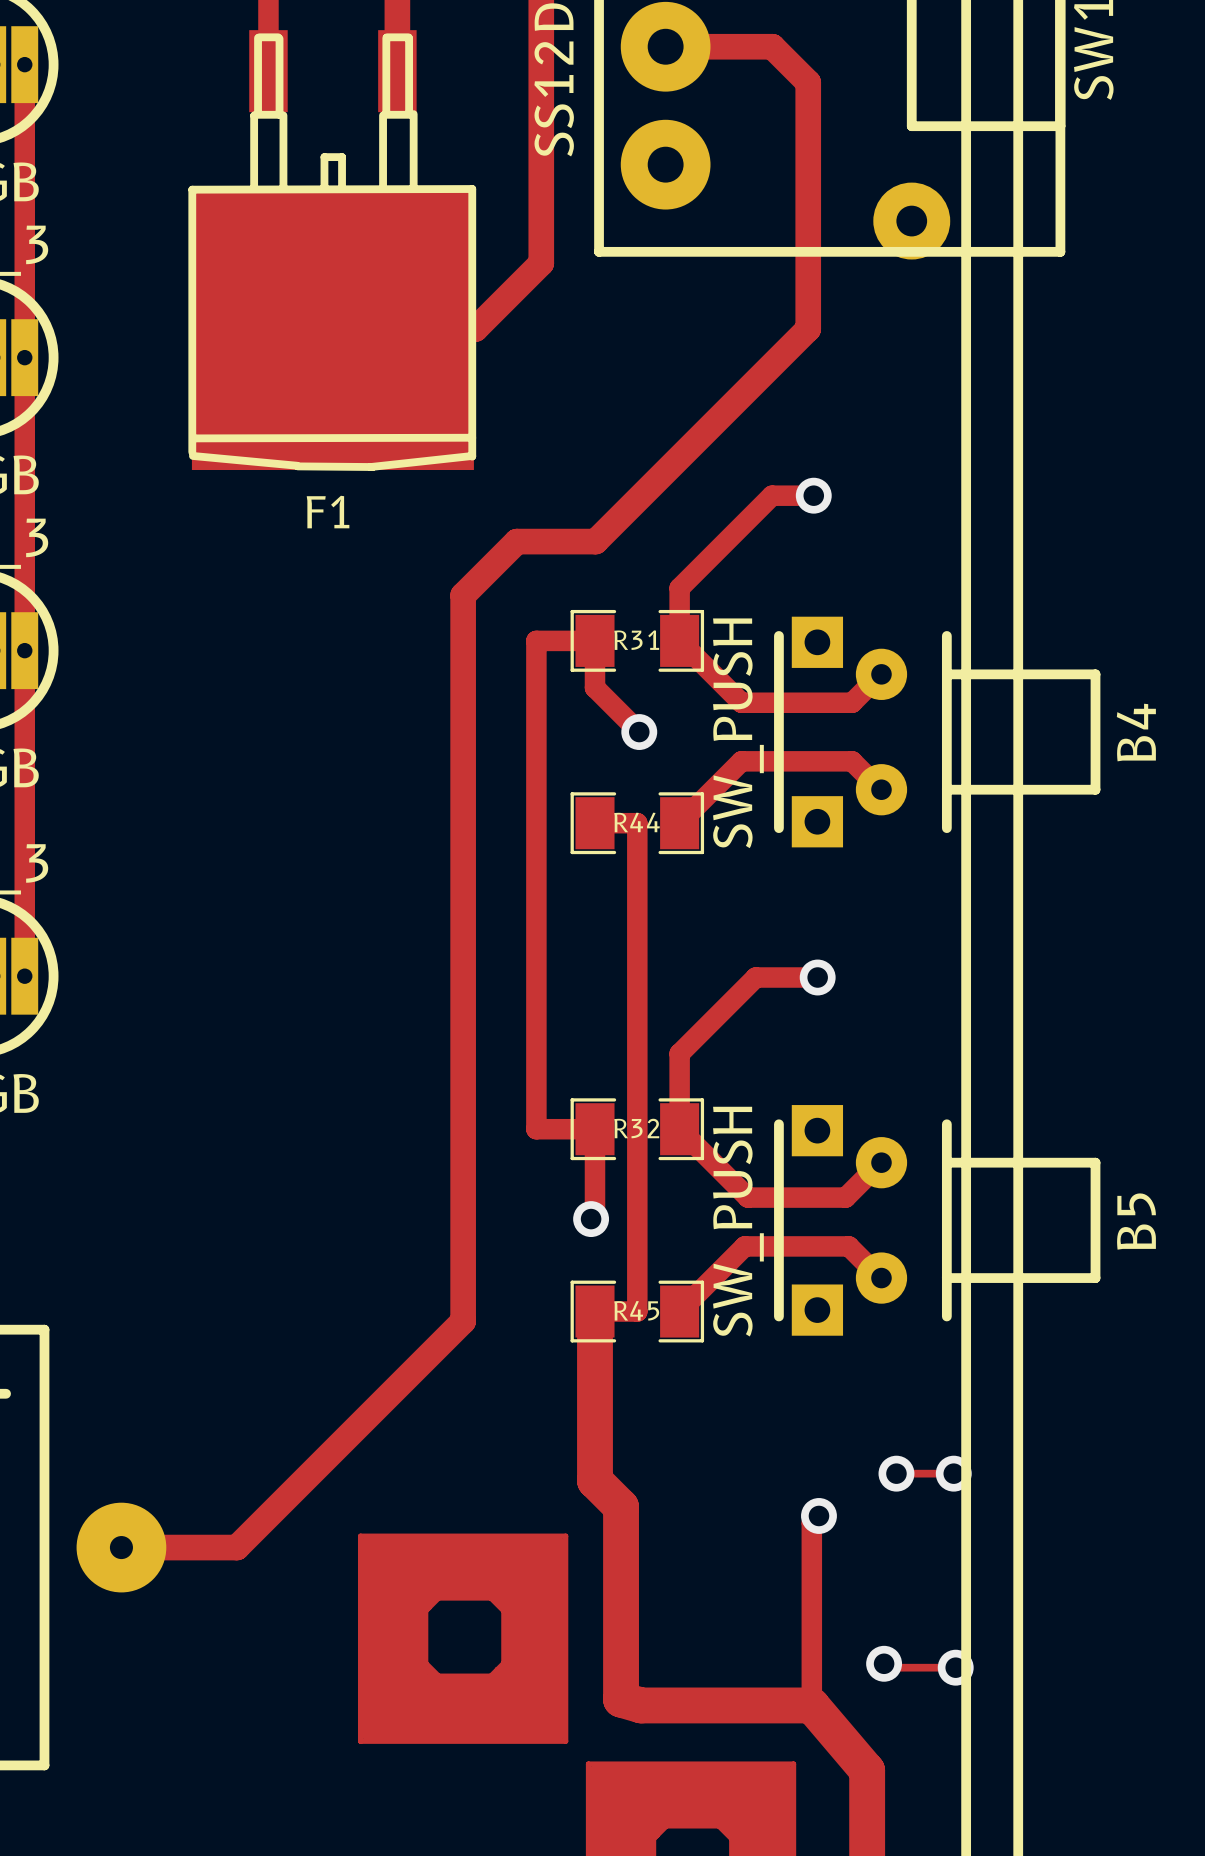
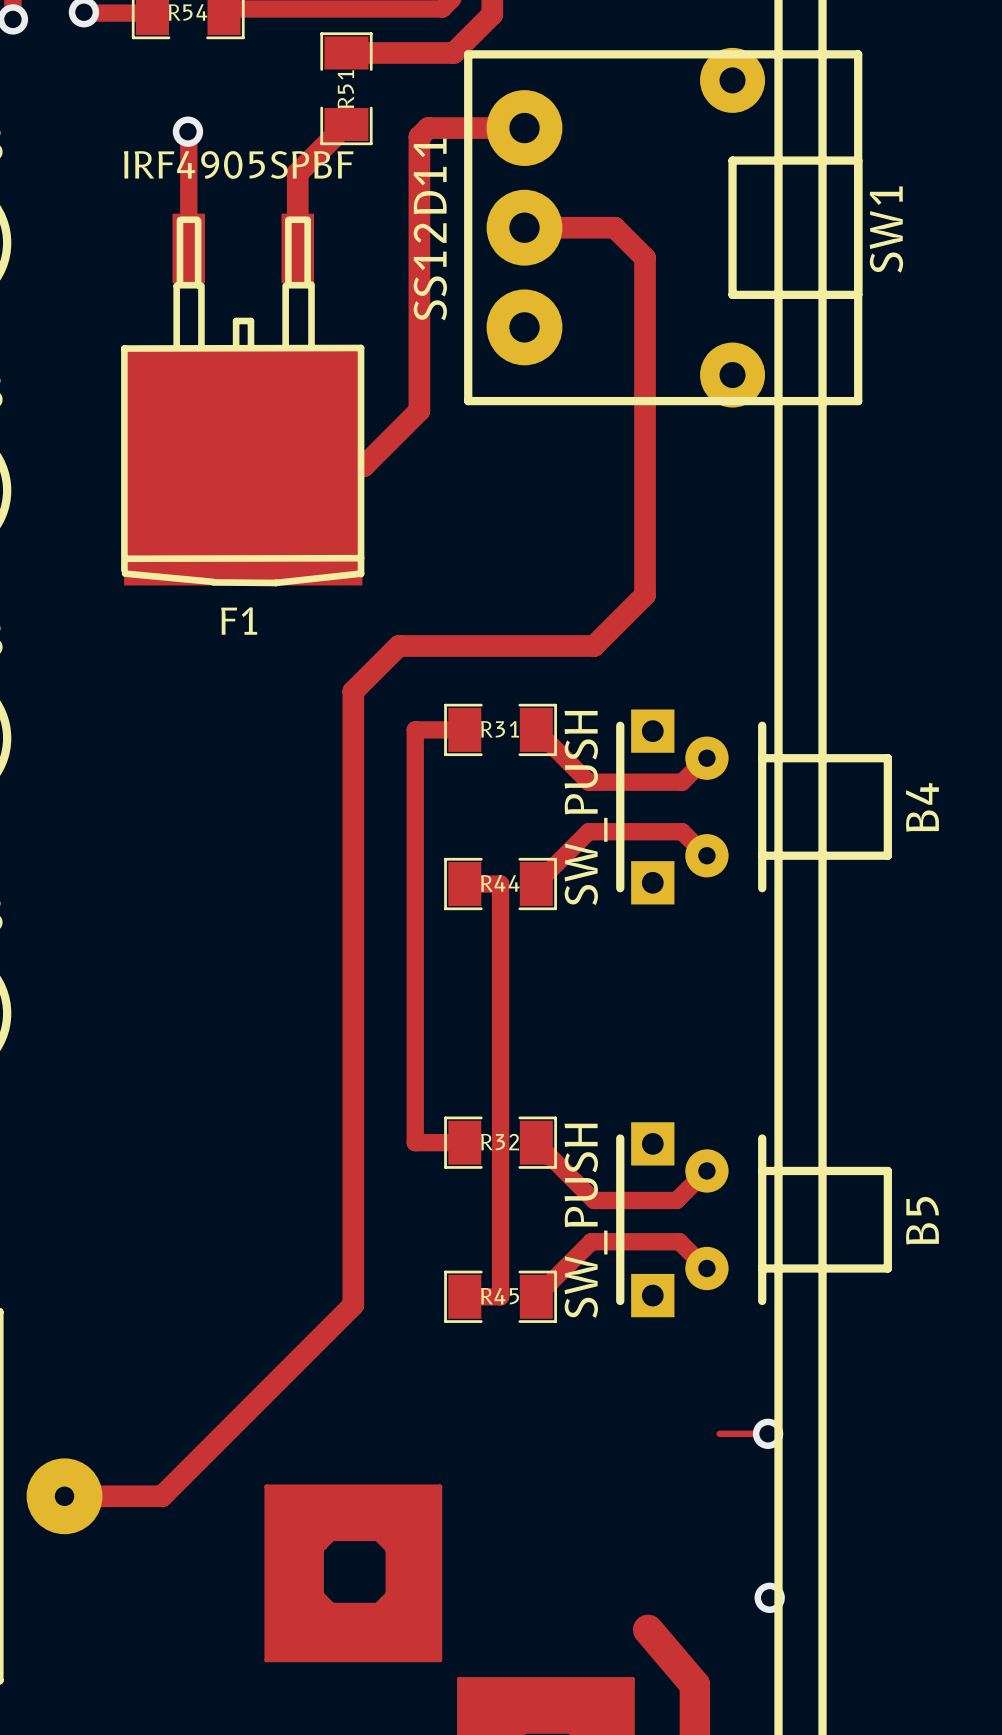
track: (808, 329) (595, 541) -> (645, 466) (645, 595) (594, 645) (465, 645)
track: (813, 495) (772, 495) (679, 588) (679, 640) -> none
via: (813, 495) -> none
track: (594, 640) (594, 687) (639, 732) -> none
via: (639, 732) -> none
track: (817, 977) (755, 977) (679, 1053) (679, 1129) -> none
via: (817, 977) -> none
track: (594, 1129) (594, 1215) (591, 1219) -> none
via: (591, 1219) -> none
track: (594, 1311) (594, 1480) (621, 1506) (621, 1699) (641, 1705) (811, 1705) (811, 1523) (818, 1515) -> none
via: (896, 1473) -> none
via: (818, 1515) -> none
track: (884, 1663) (887, 1667) (955, 1667) -> none
via: (884, 1663) -> none

